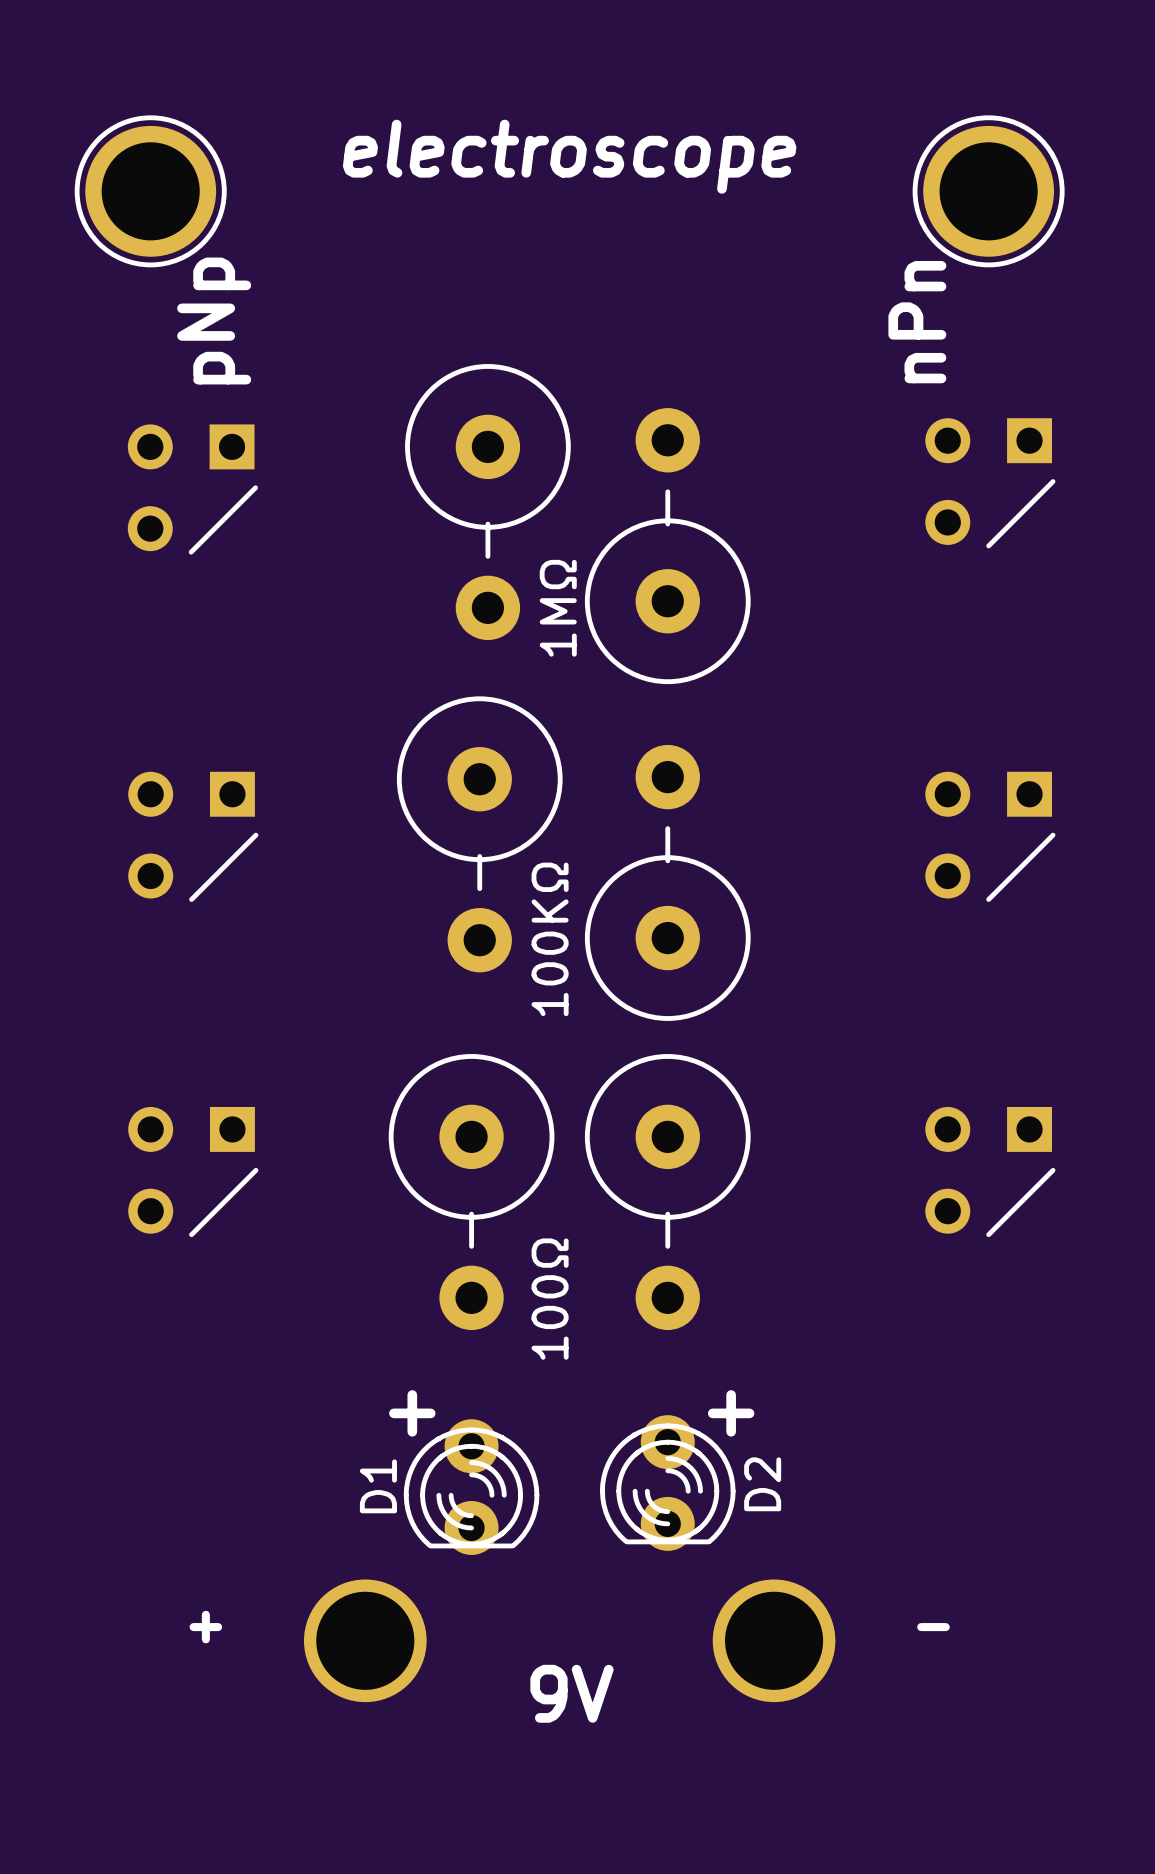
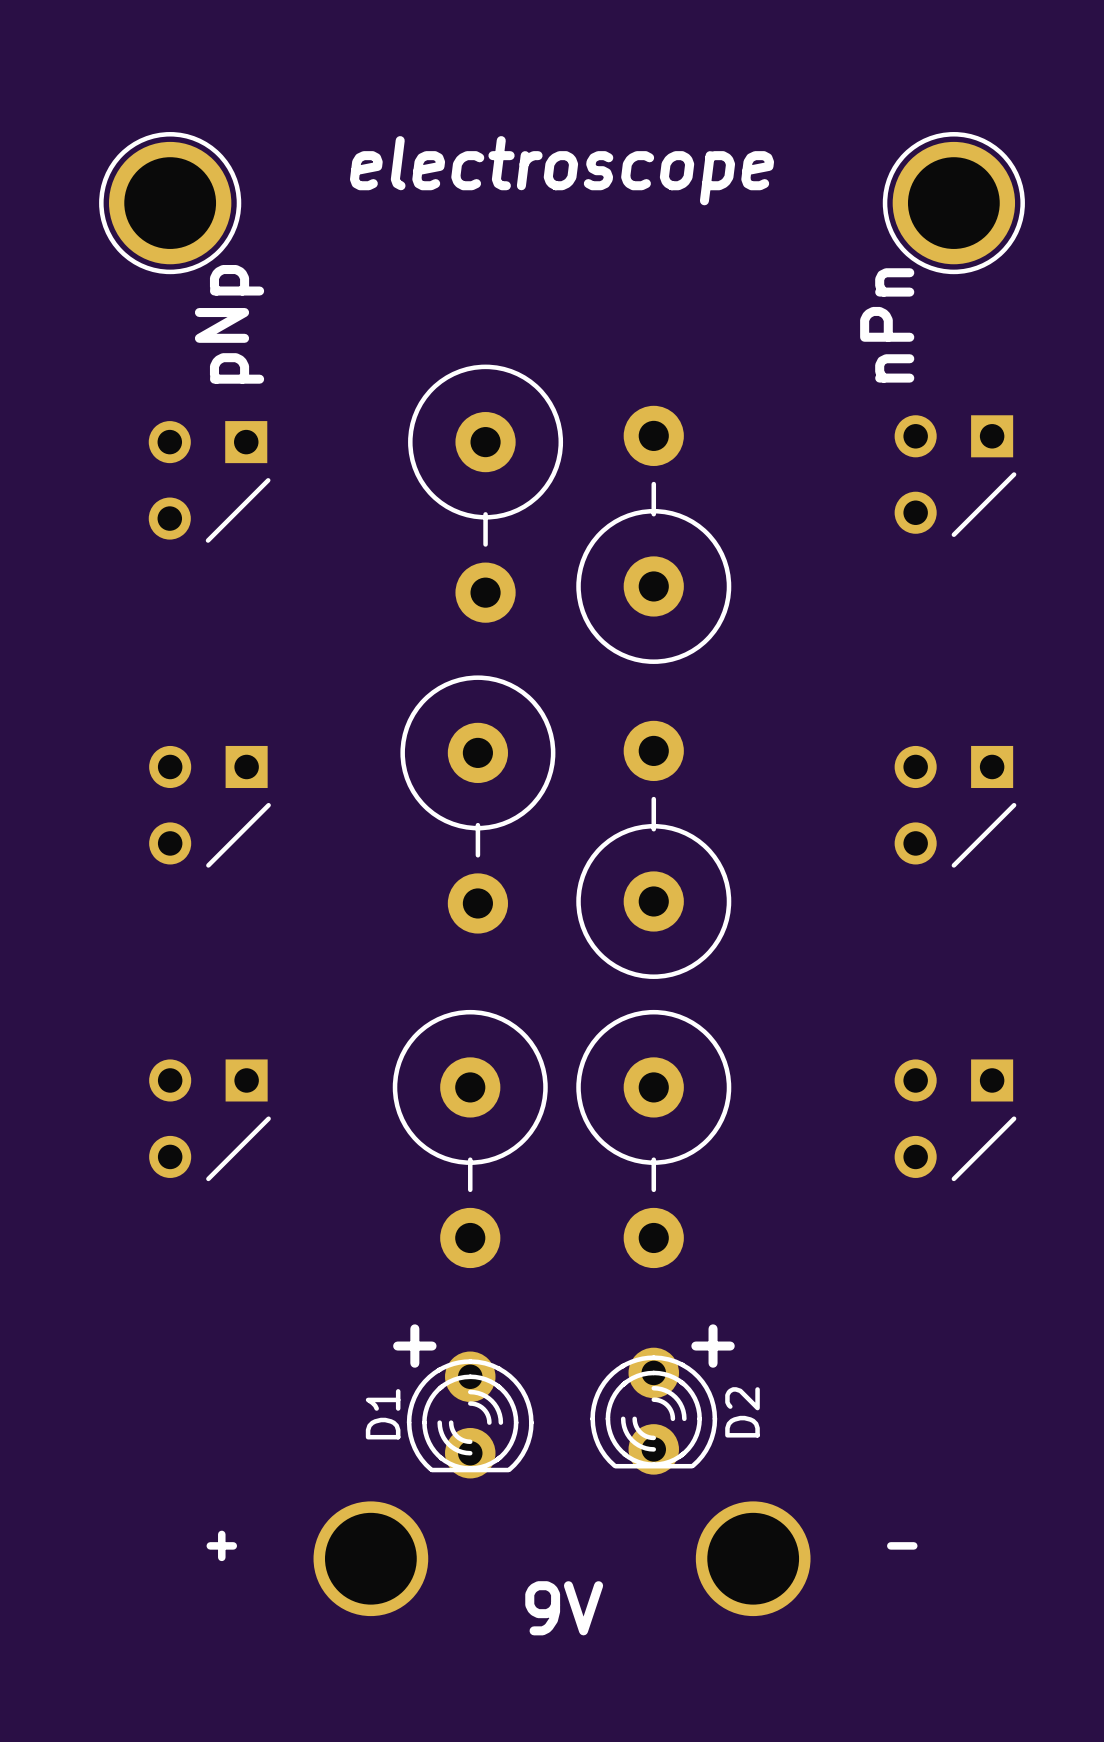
part value: 1MΩ (558, 608) -> none
part value: 100KΩ (550, 939) -> none
part value: 100Ω (550, 1299) -> none

